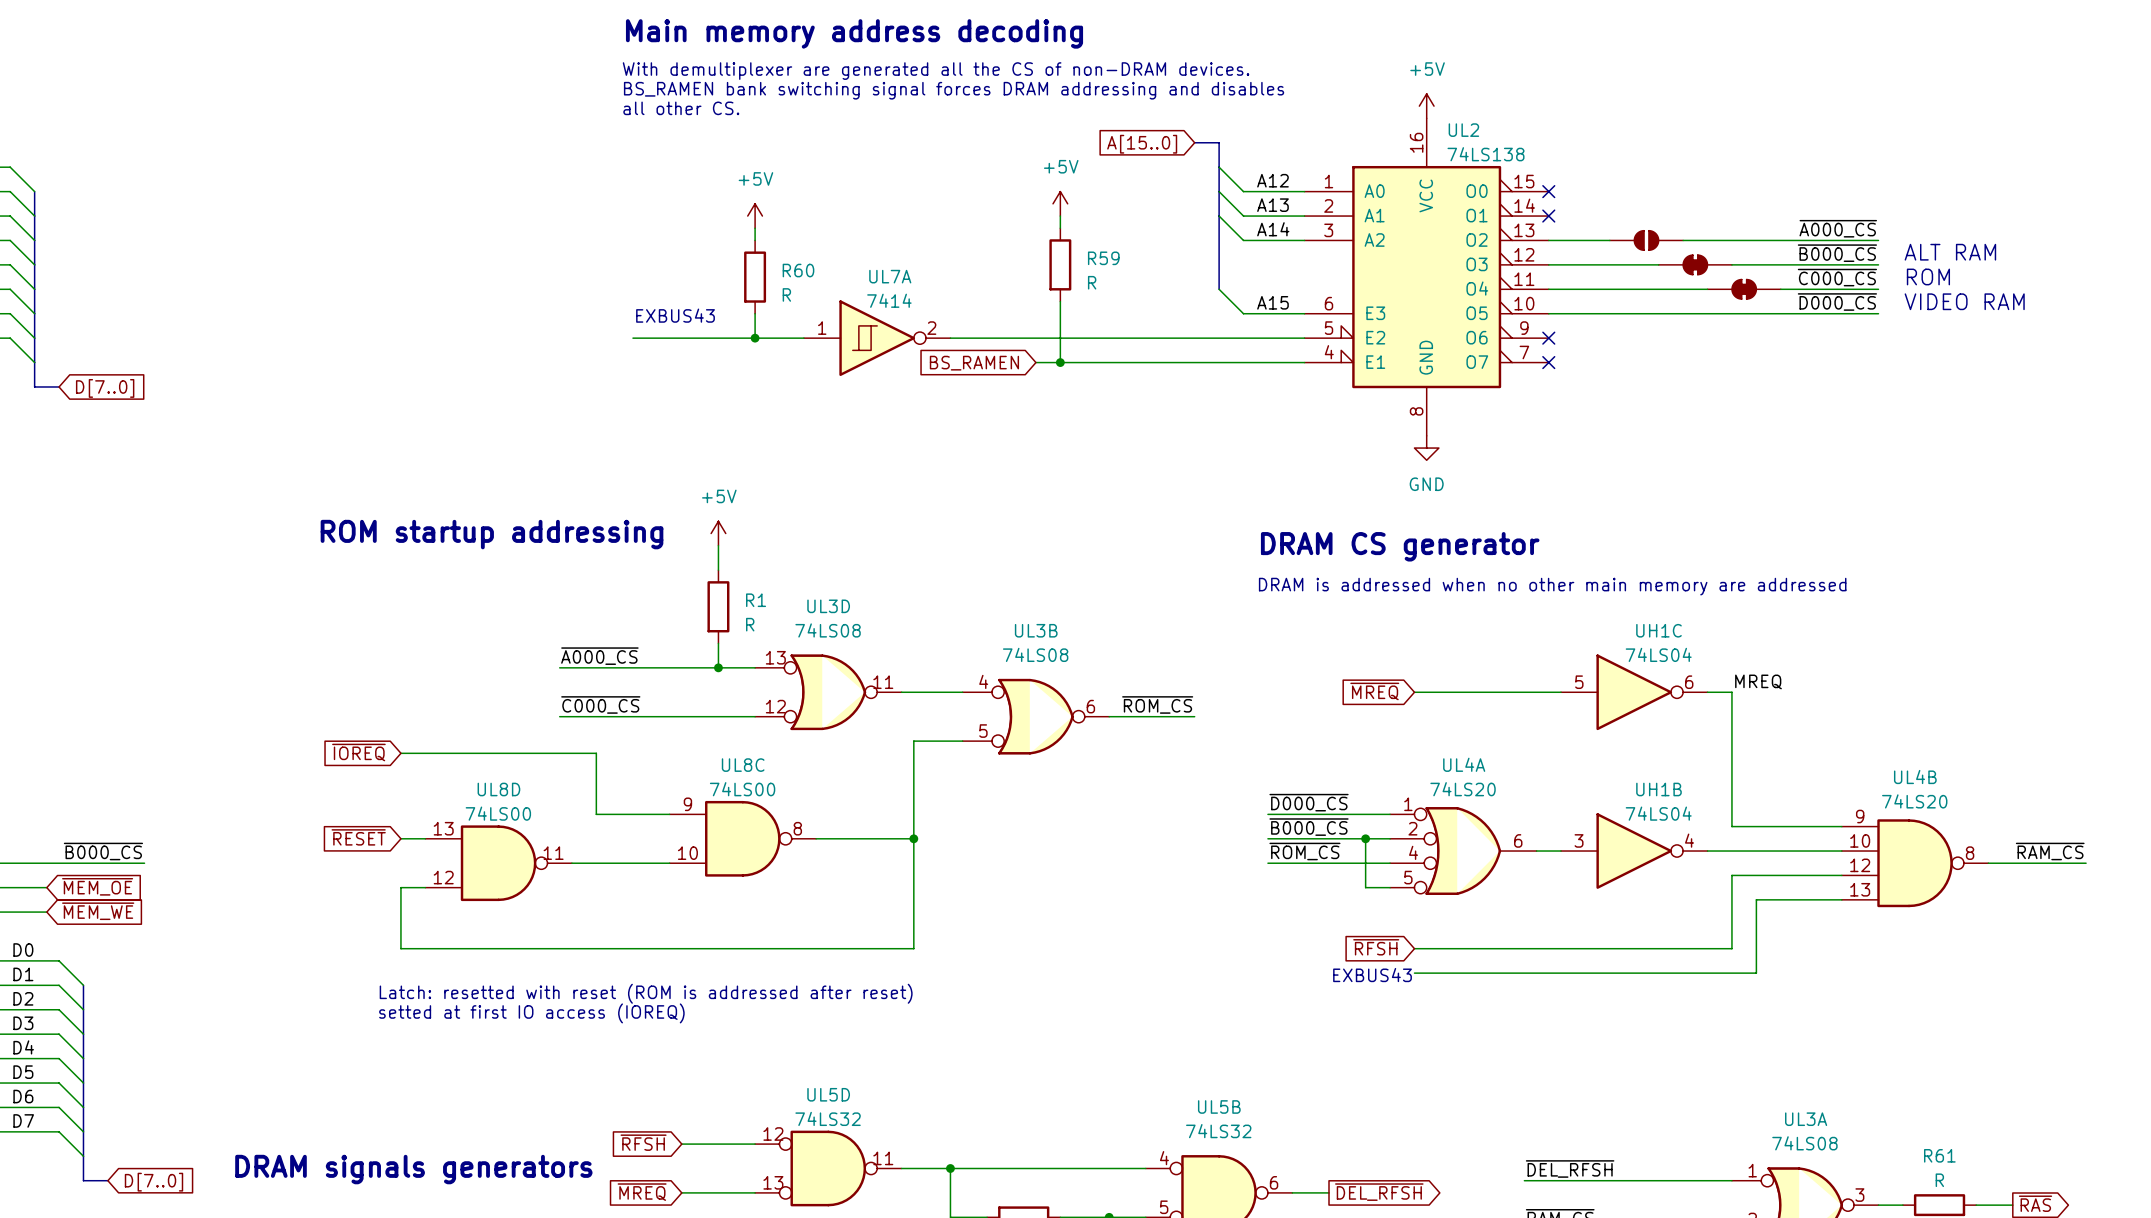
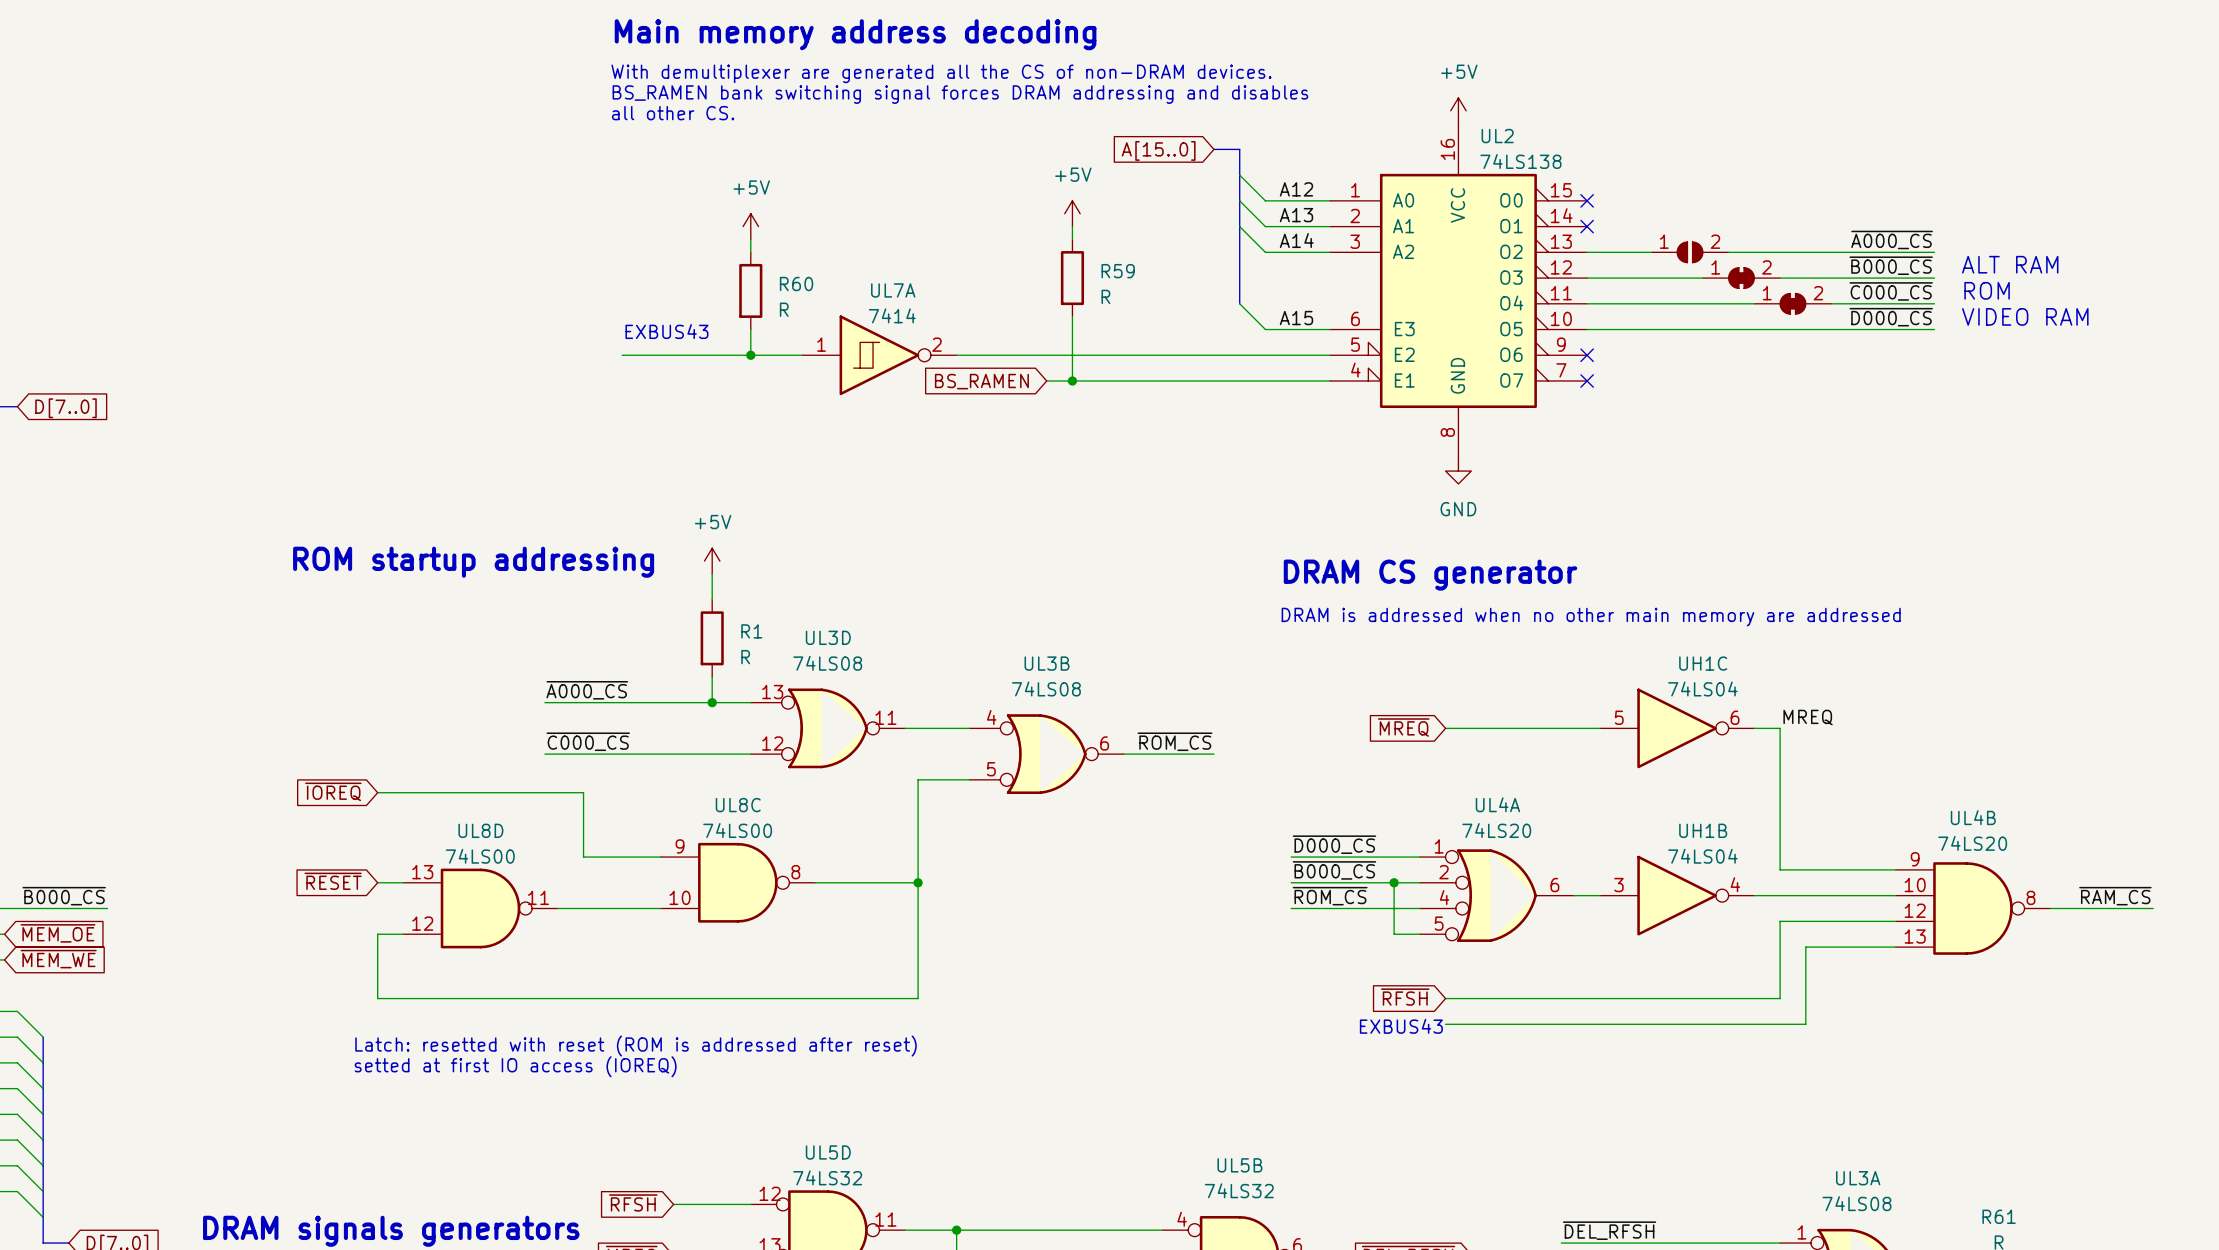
part pin number: none -> 1 (1664, 241)
part pin number: none -> 2 (1715, 241)
part pin number: none -> 1 (1715, 267)
part pin number: none -> 2 (1766, 267)
part pin number: none -> 1 (1767, 293)
part pin number: none -> 2 (1818, 293)

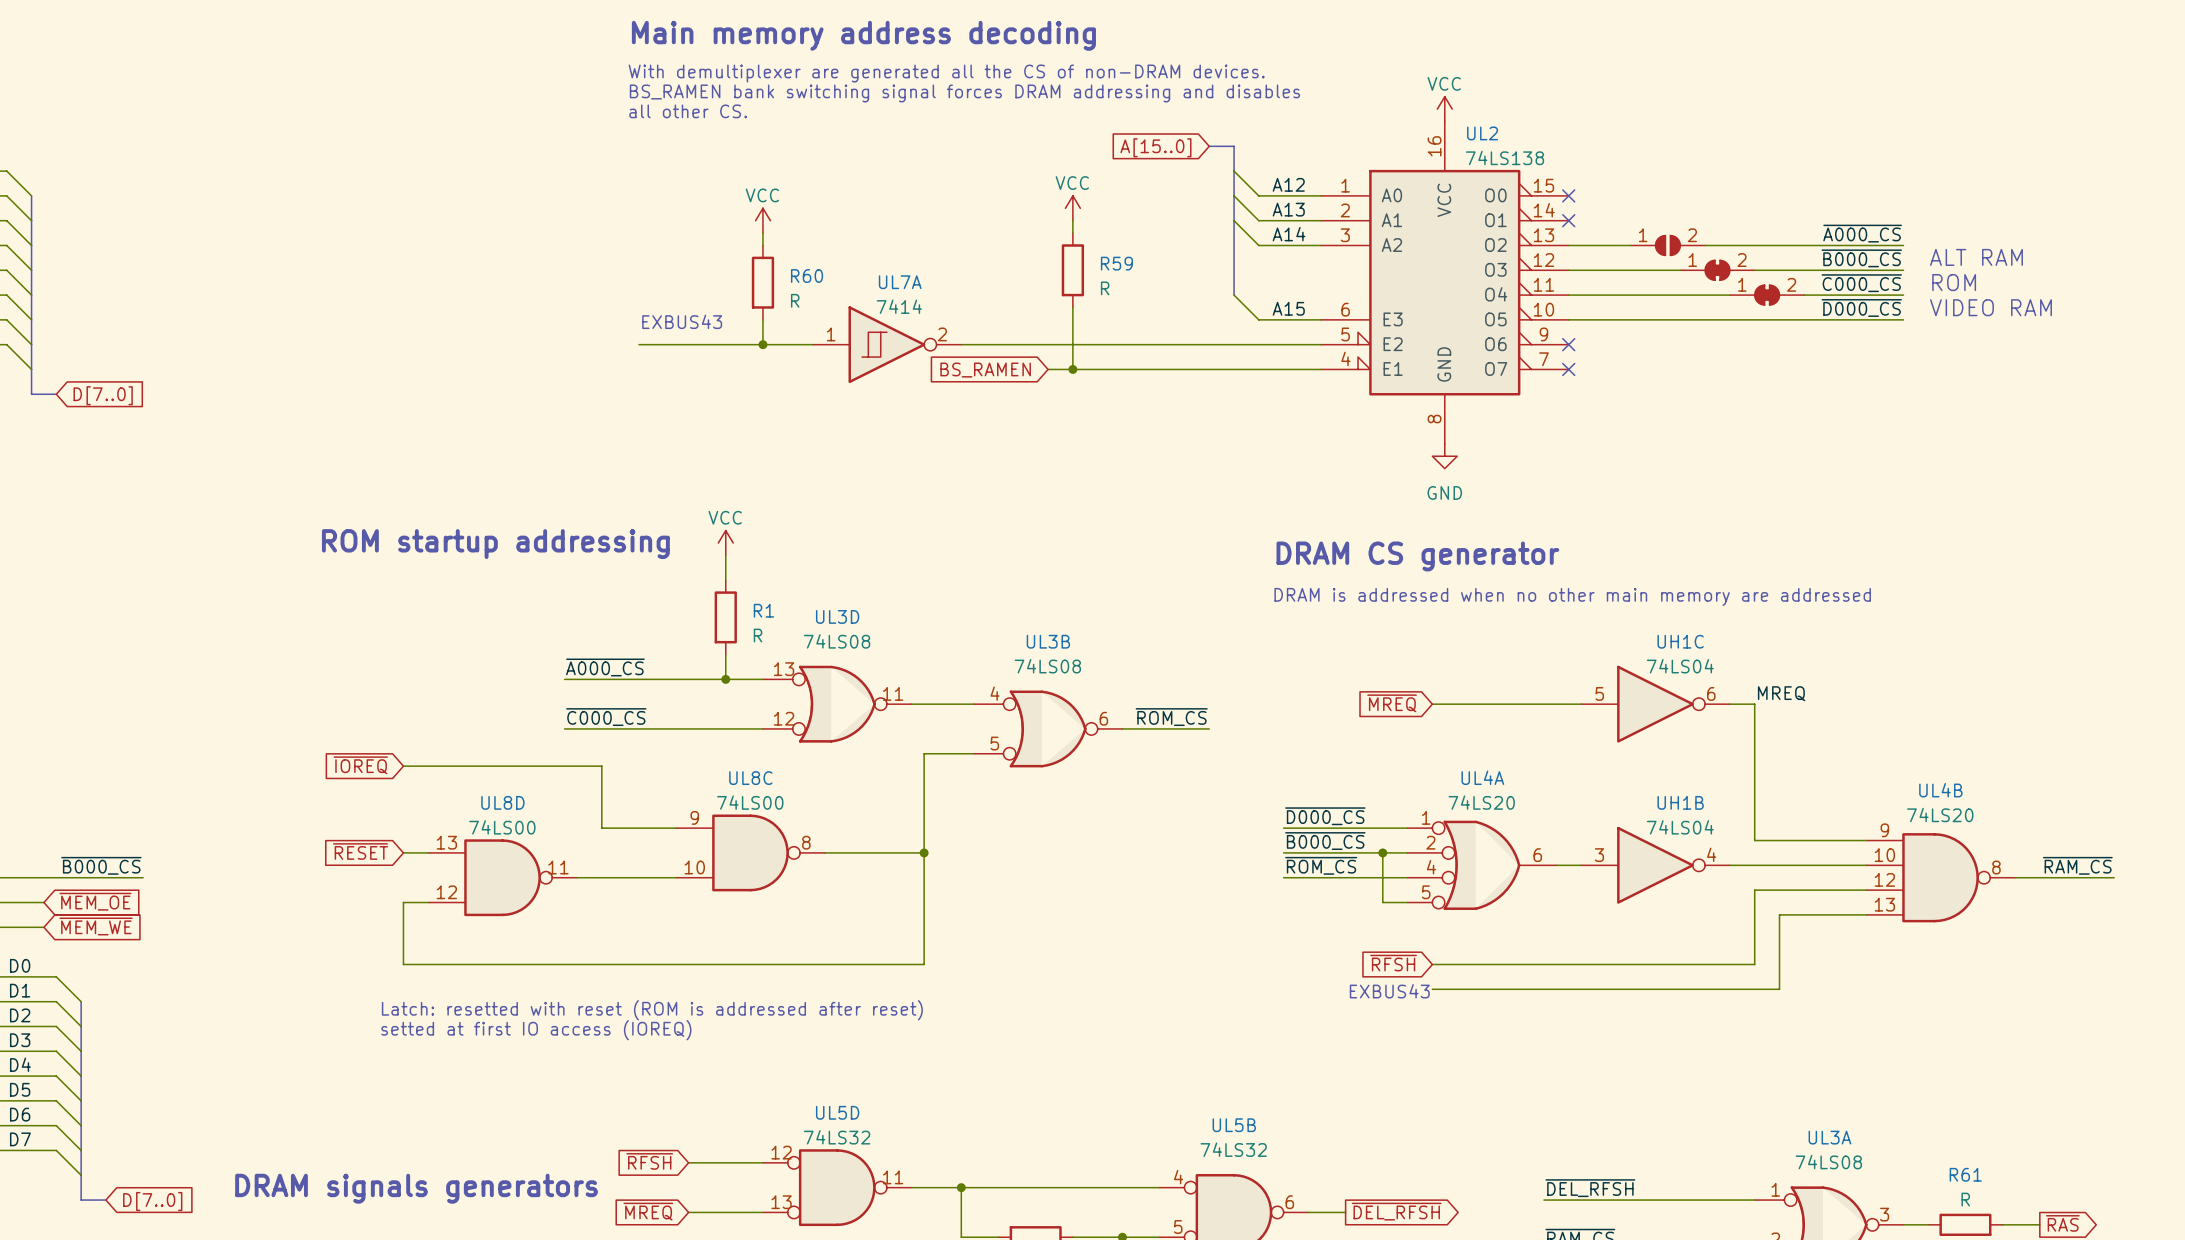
power symbol: +5V (1458, 110) -> VCC (1444, 109)
power symbol: +5V (1072, 213) -> VCC (1072, 208)
power symbol: +5V (750, 226) -> VCC (762, 220)
power symbol: +5V (712, 561) -> VCC (725, 543)

